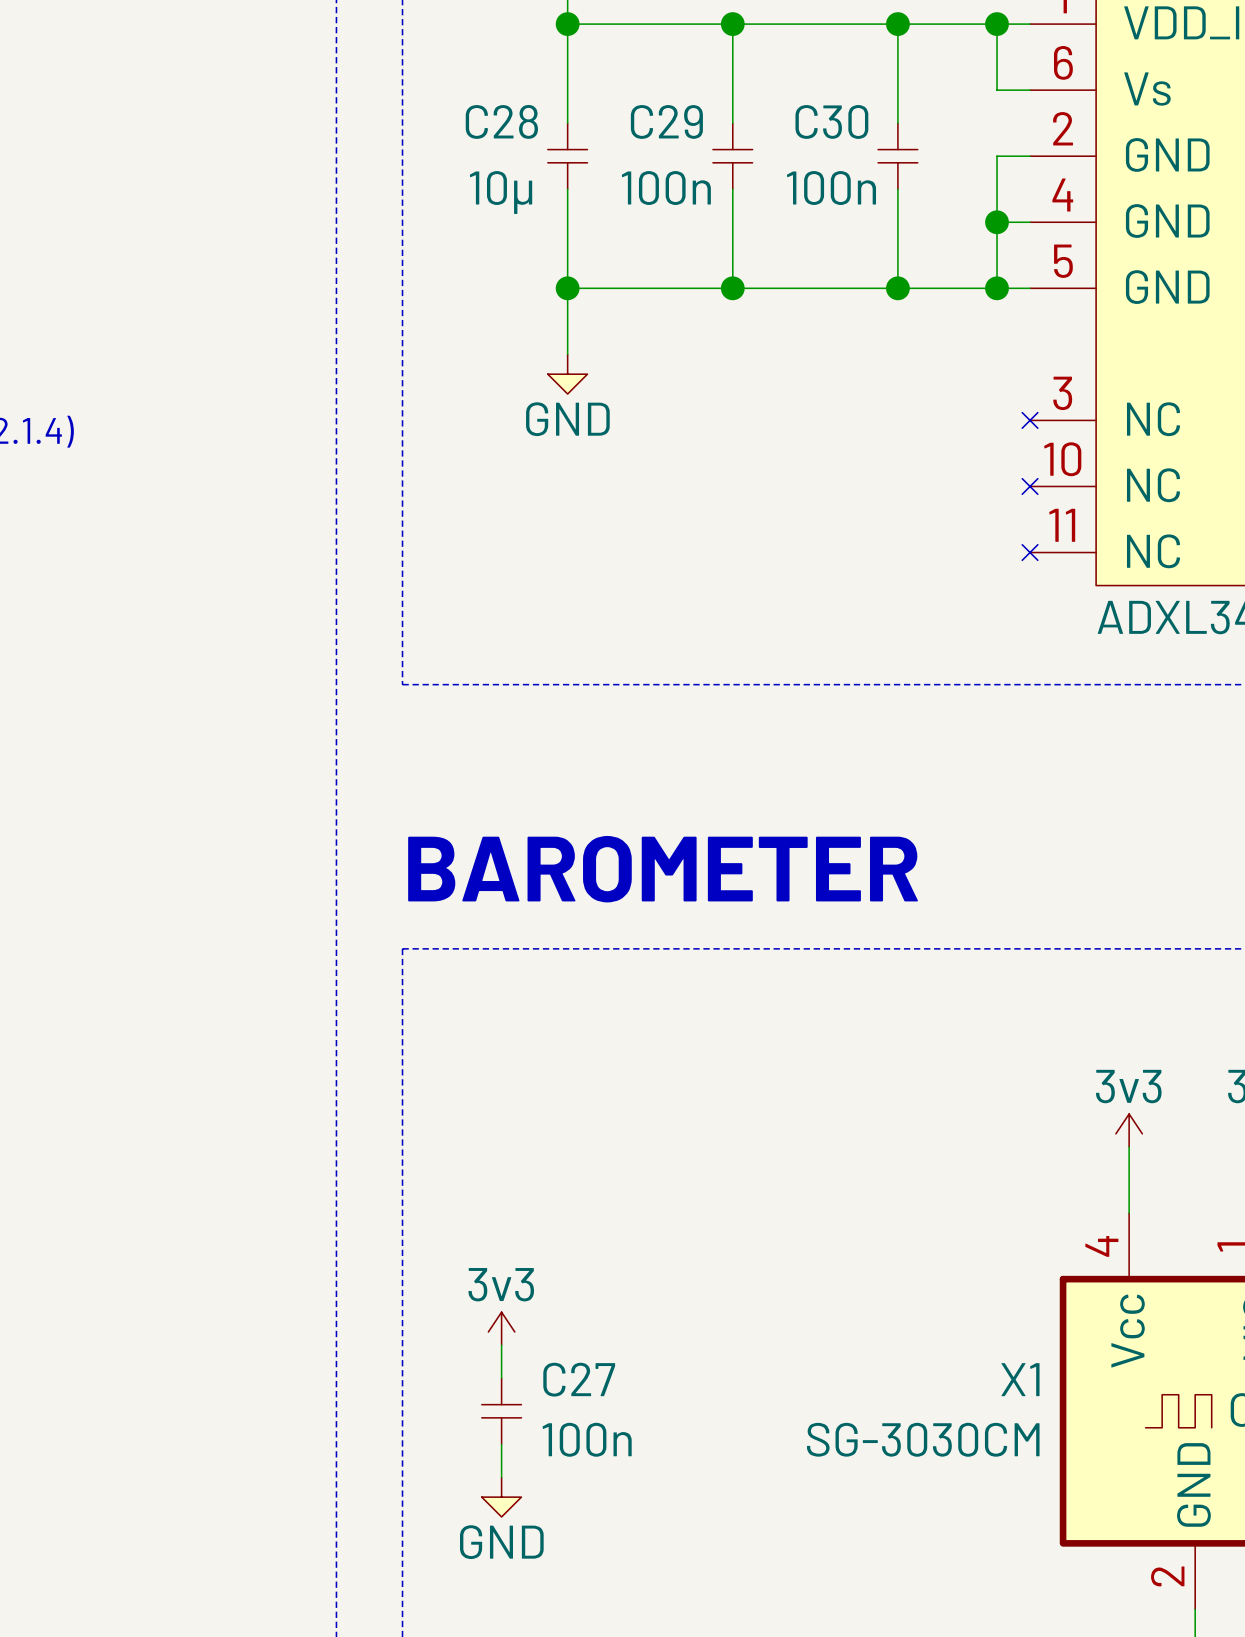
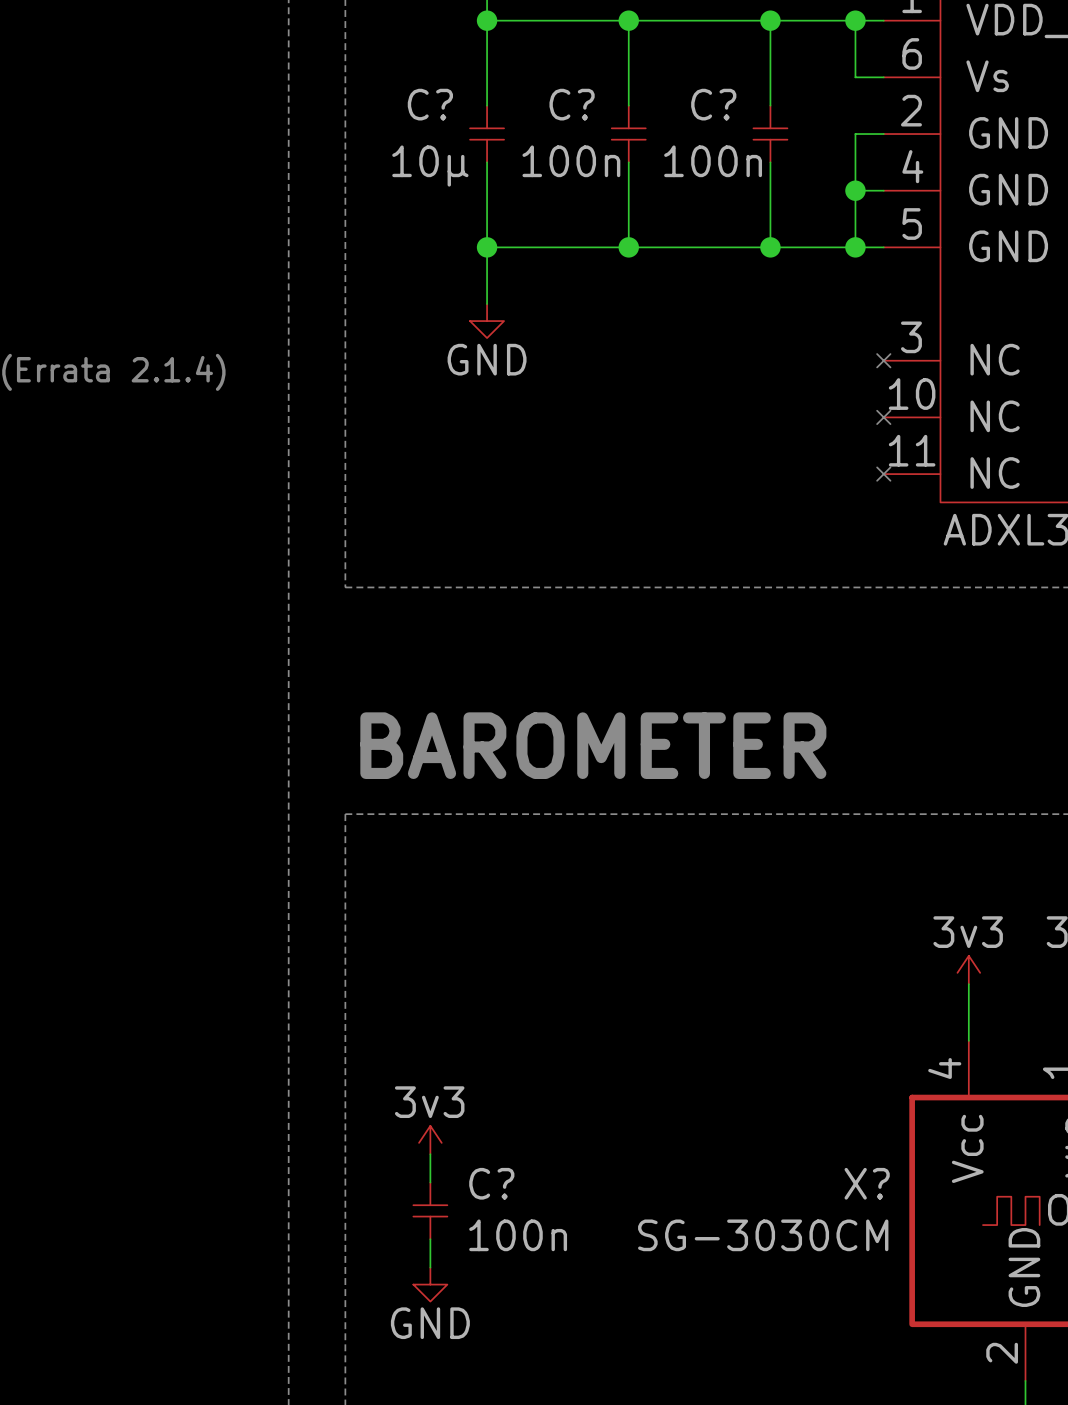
C28 name: C28 (501, 121) -> C? (430, 104)
C29 name: C29 (666, 121) -> C? (572, 104)
C30 name: C30 (831, 121) -> C? (713, 104)
C27 name: C27 (579, 1379) -> C? (491, 1183)
X1 name: X1 (1020, 1379) -> X? (867, 1183)

